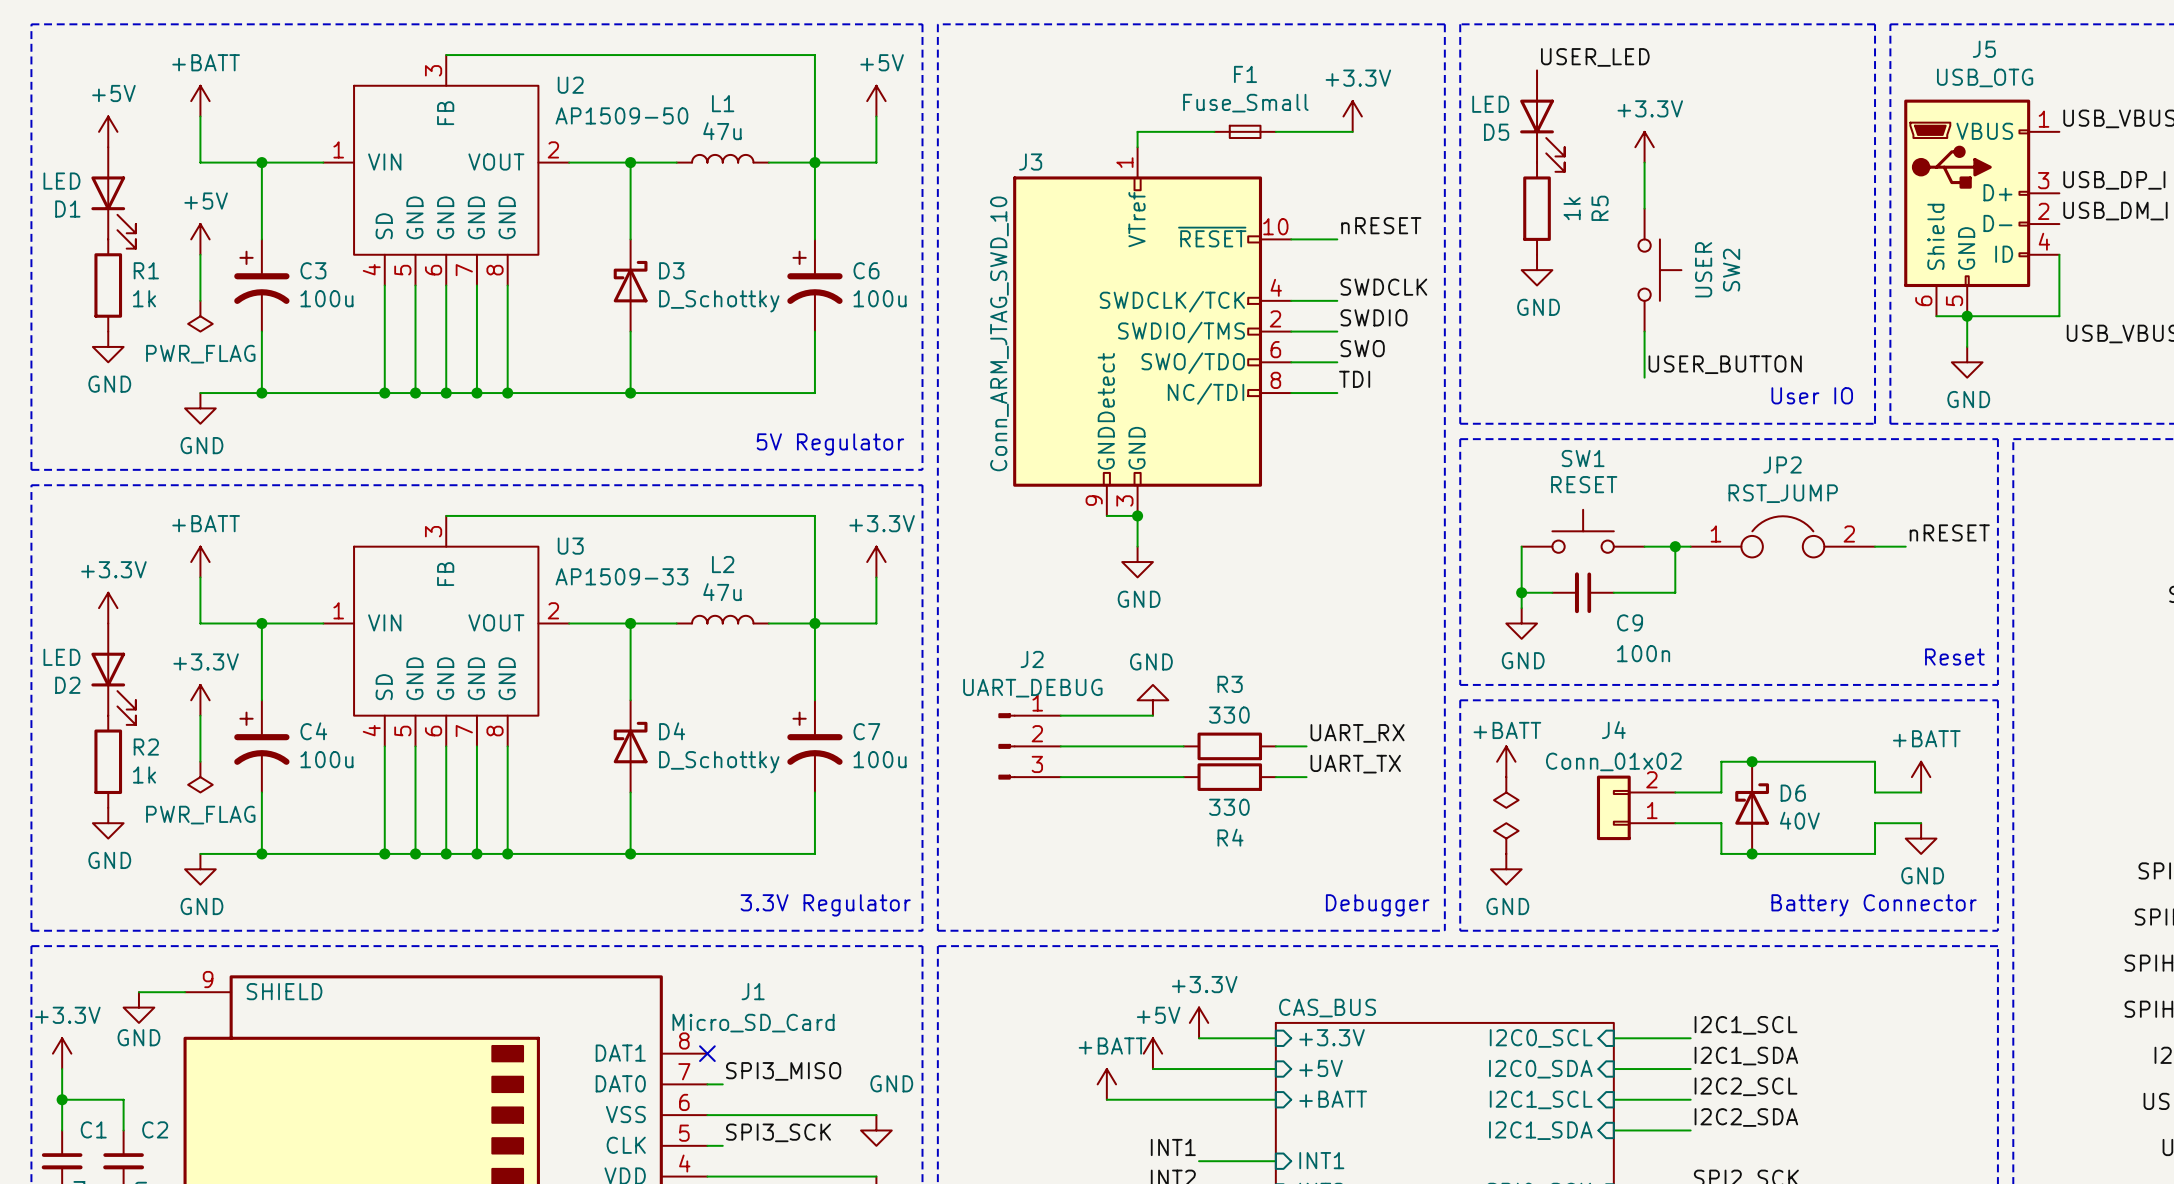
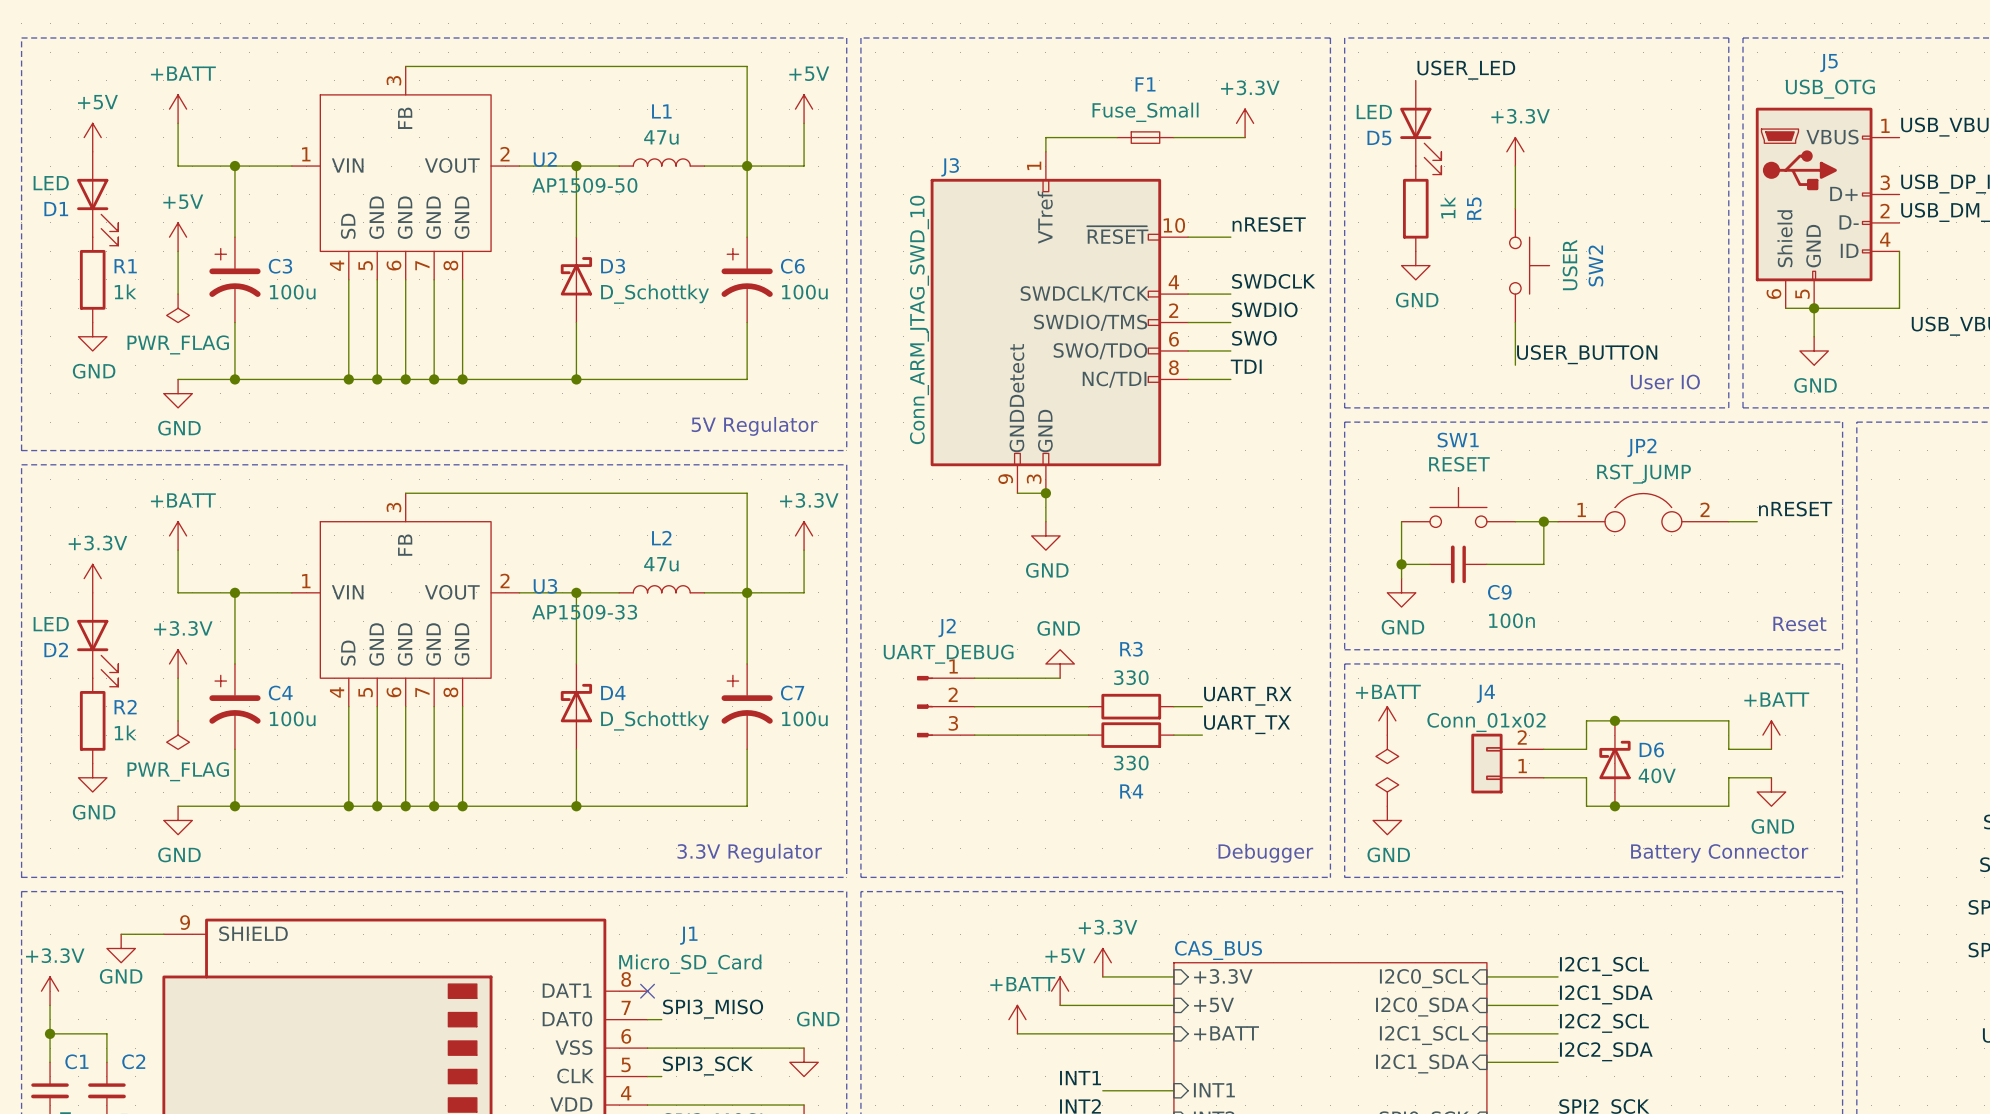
U2 name position: U2 (570, 85) -> U2 (545, 159)
U2 value position: AP1509-50 (621, 115) -> AP1509-50 (584, 185)
U3 name position: U3 (570, 546) -> U3 (545, 586)
U3 value position: AP1509-33 (621, 576) -> AP1509-33 (584, 612)

